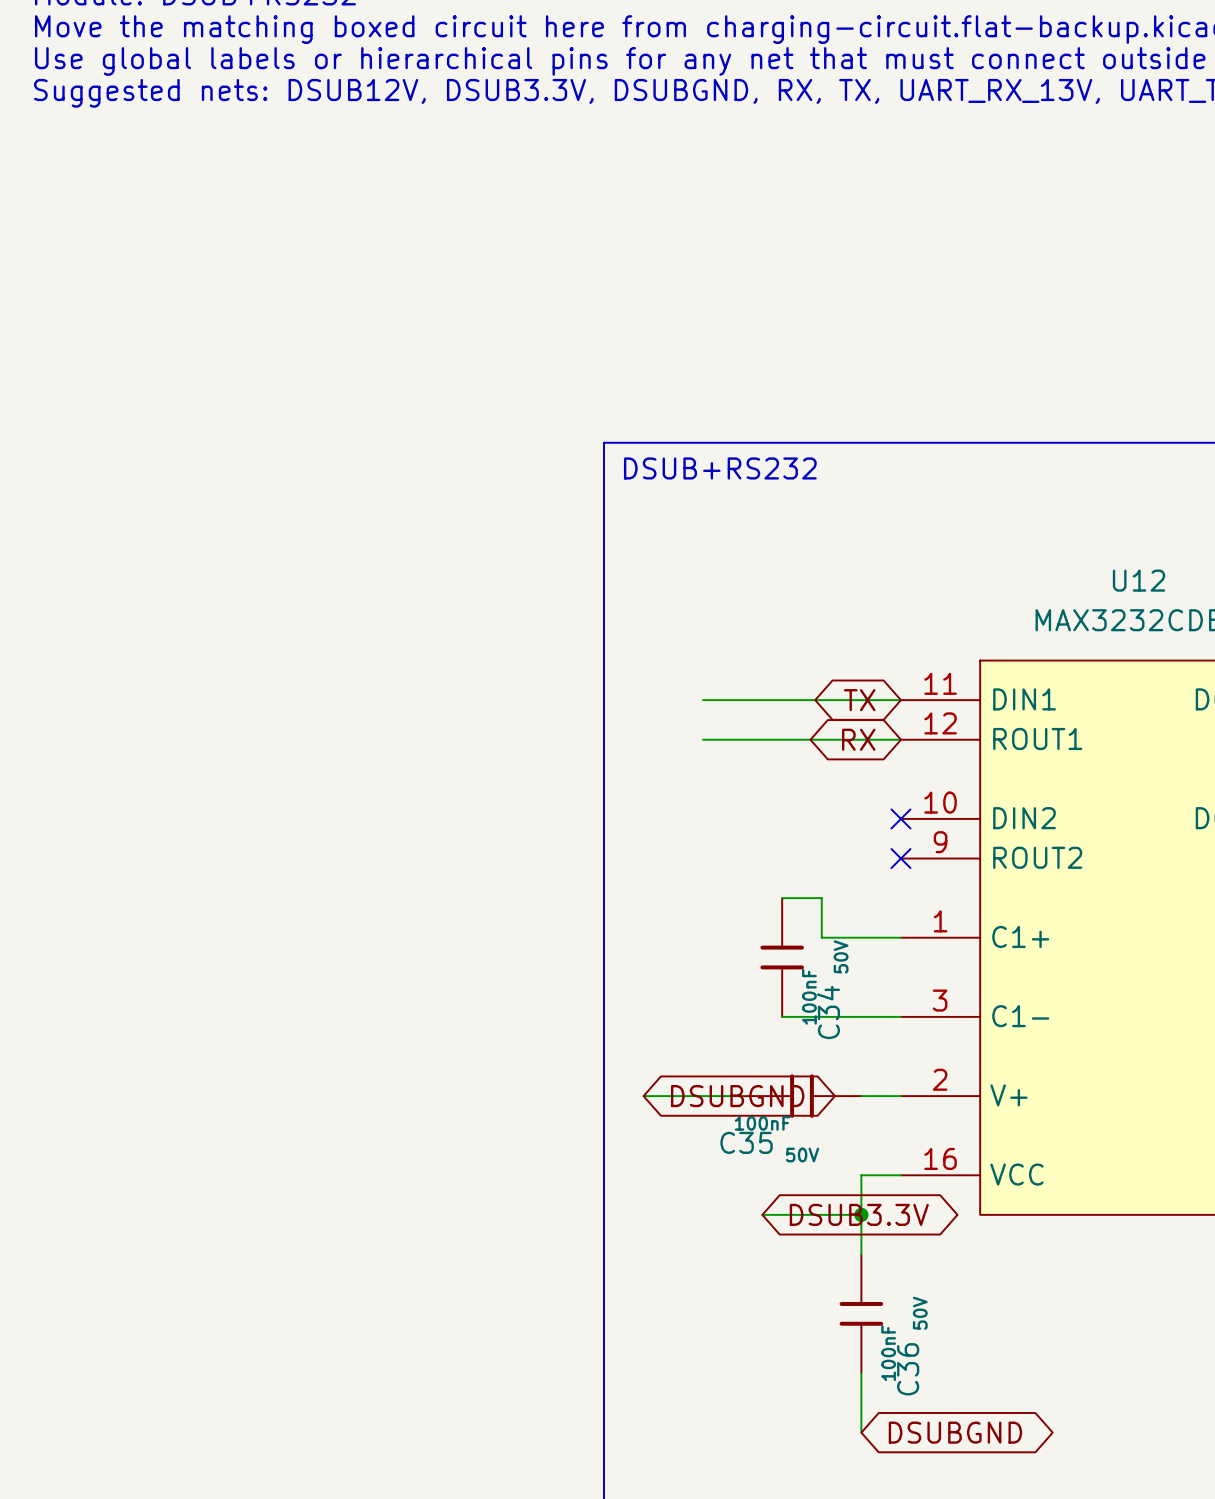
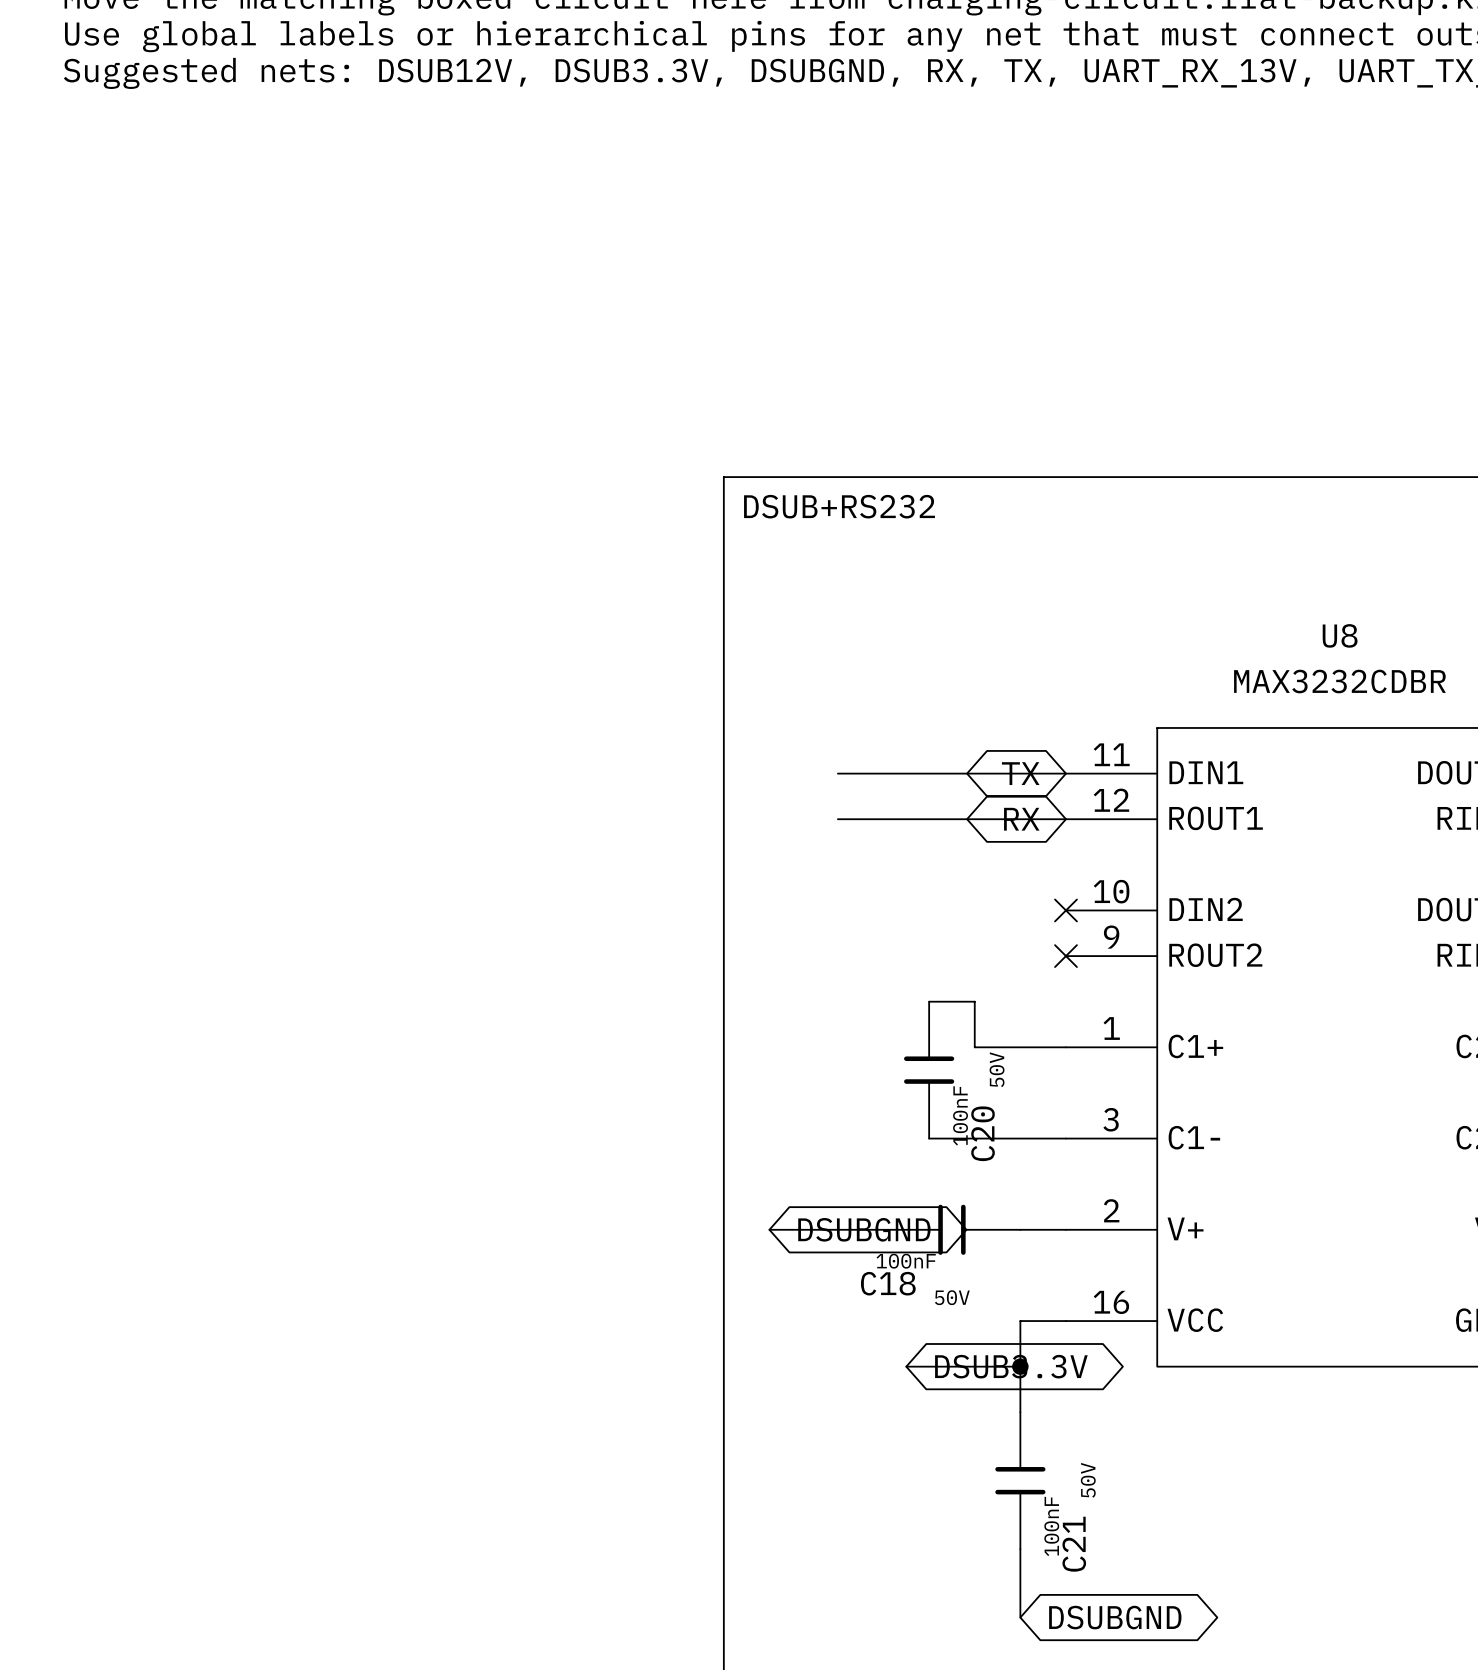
U12 name: U12 (1139, 580) -> U8 (1340, 635)
C34 name: C34 (828, 1012) -> C20 (983, 1133)
C35 name: C35 (746, 1142) -> C18 (888, 1283)
C36 name: C36 (908, 1369) -> C21 (1074, 1544)

